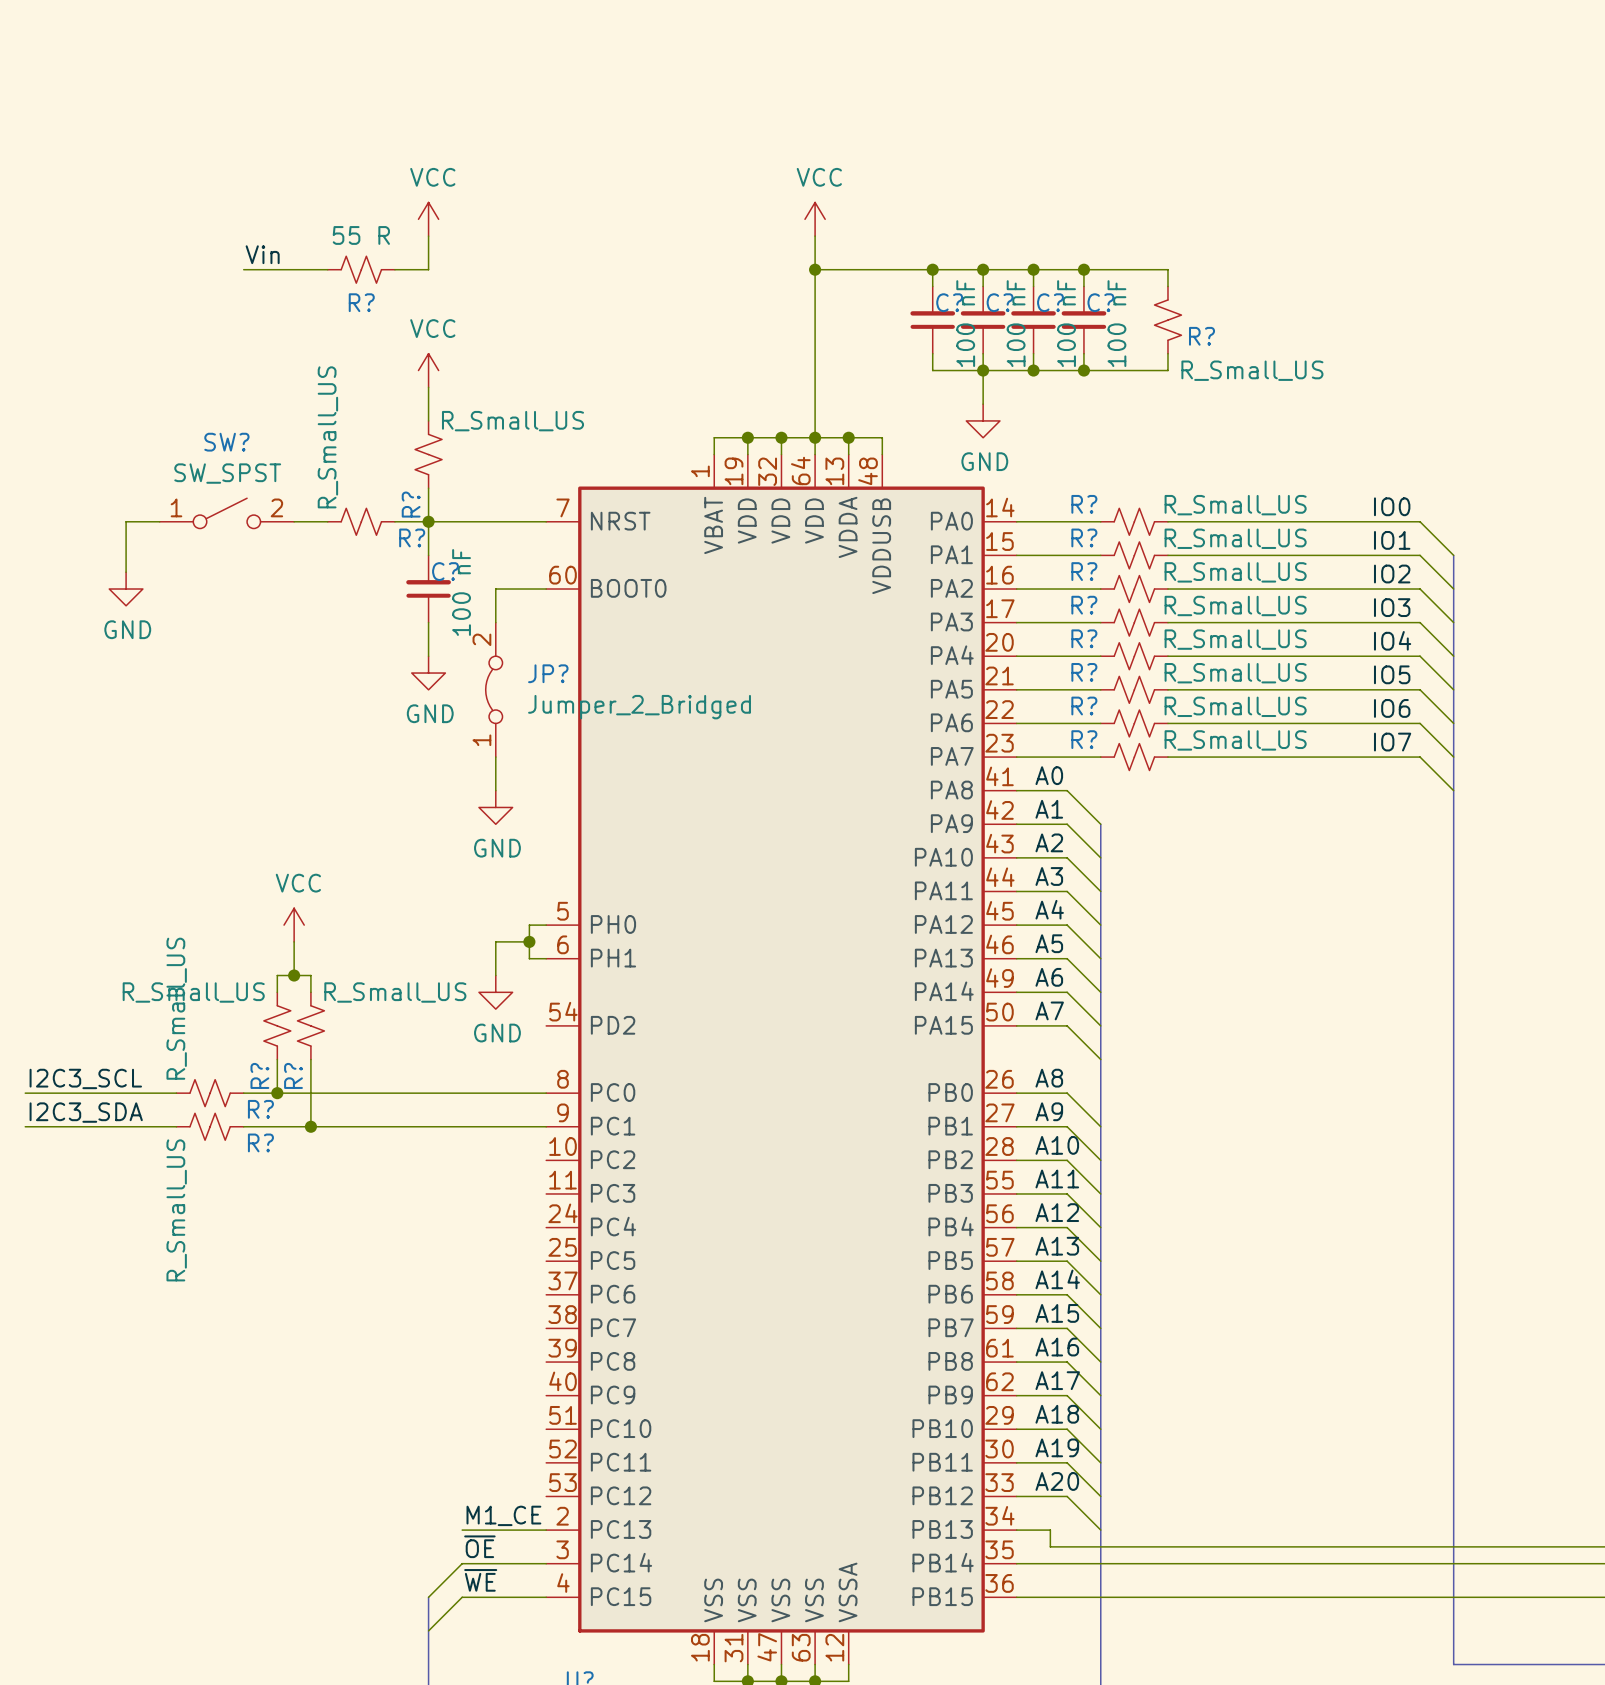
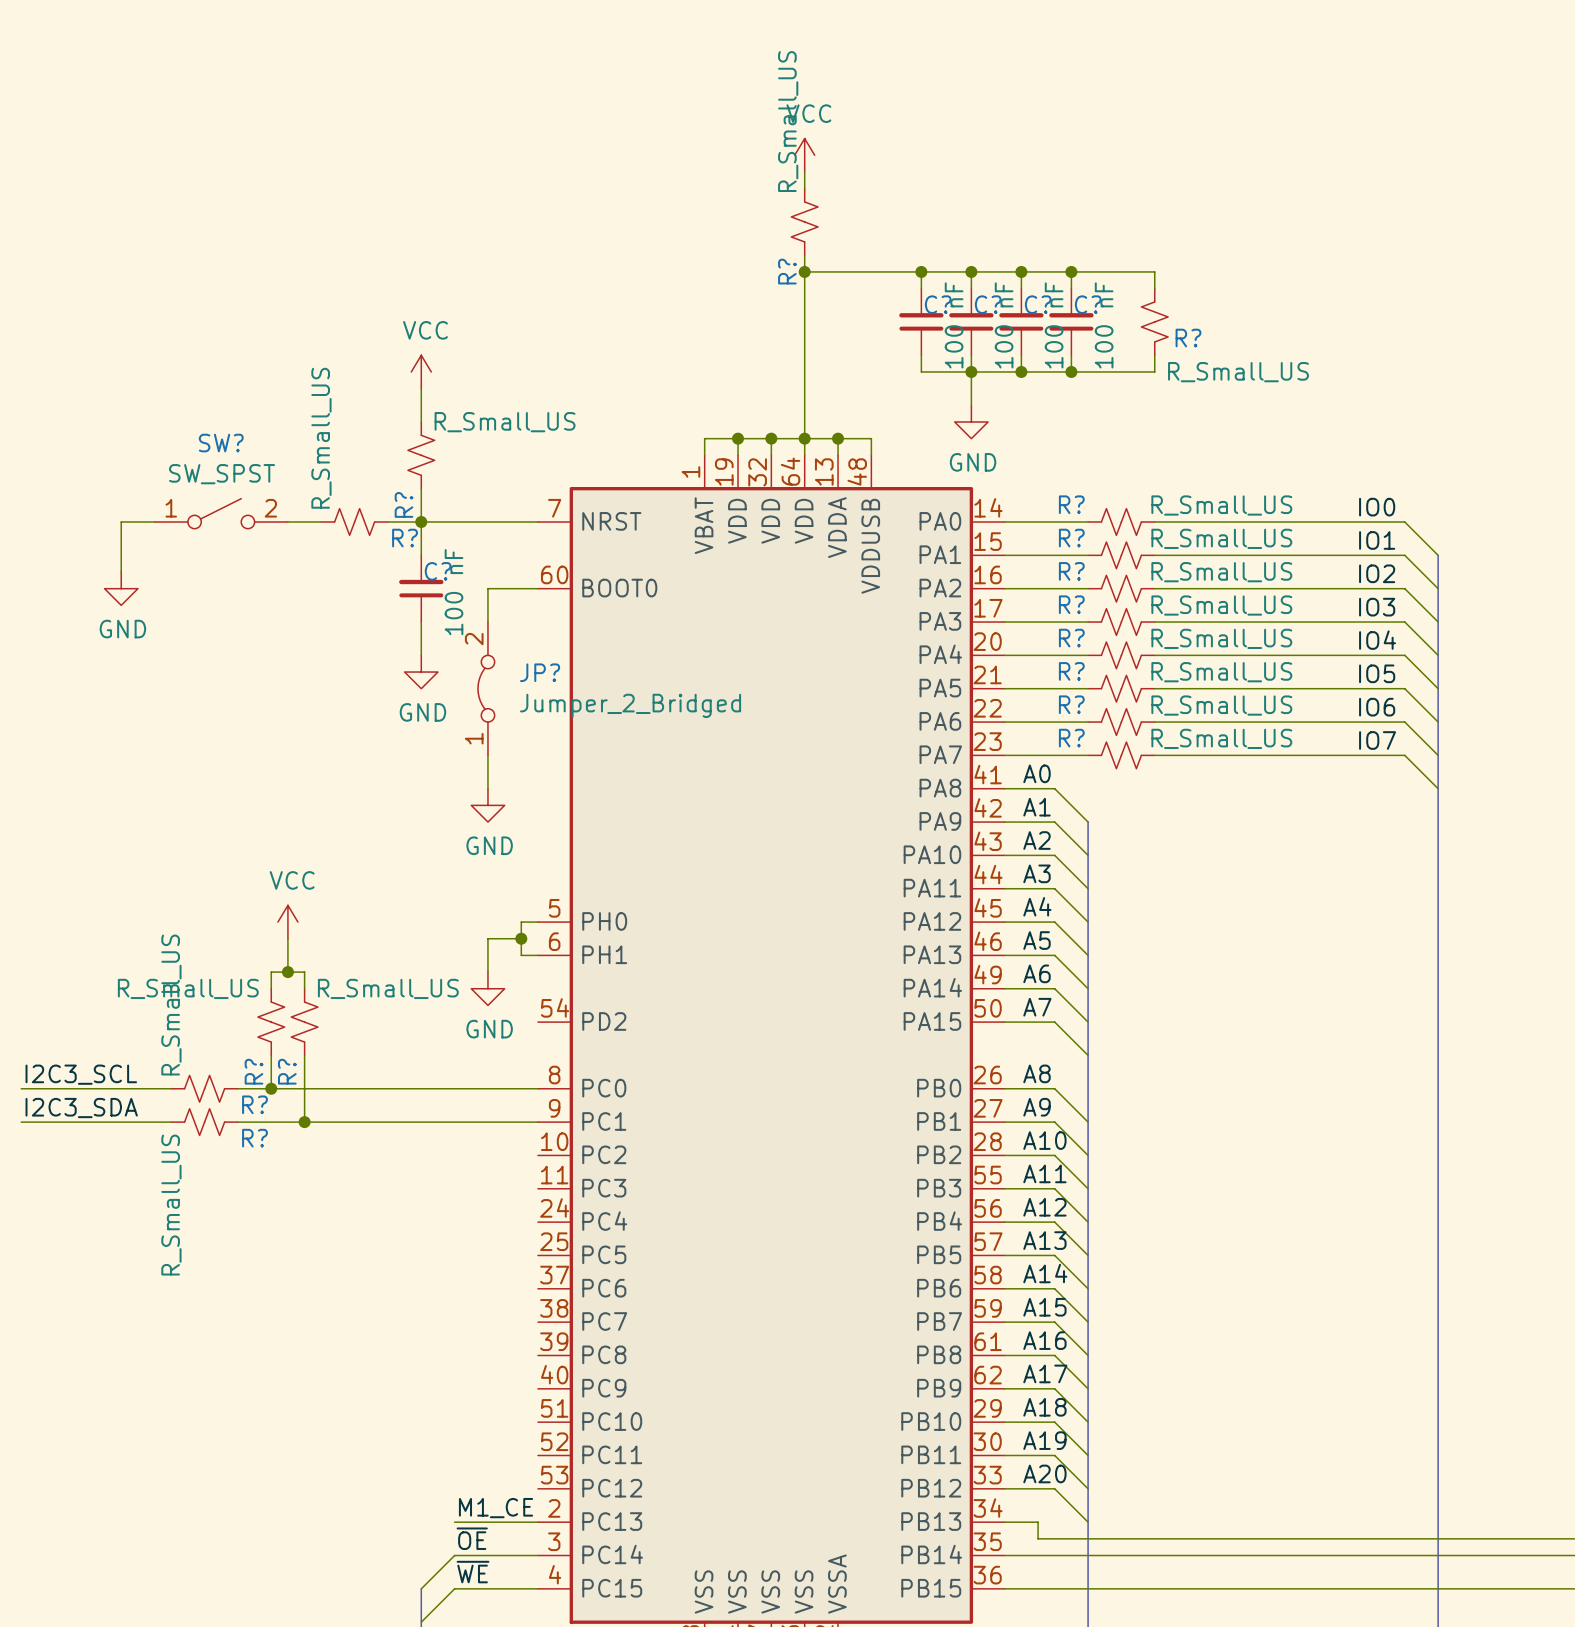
power symbol: VCC (428, 219) -> none
power symbol position: VCC (815, 219) -> VCC (804, 155)
R?: none -> R_Small_US (804, 221)
wire: (428, 236) (428, 269) (394, 269) -> none
label: Vin (262, 254) -> none
wire: (243, 269) (327, 269) -> none
R?: 55 R (361, 269) -> none

